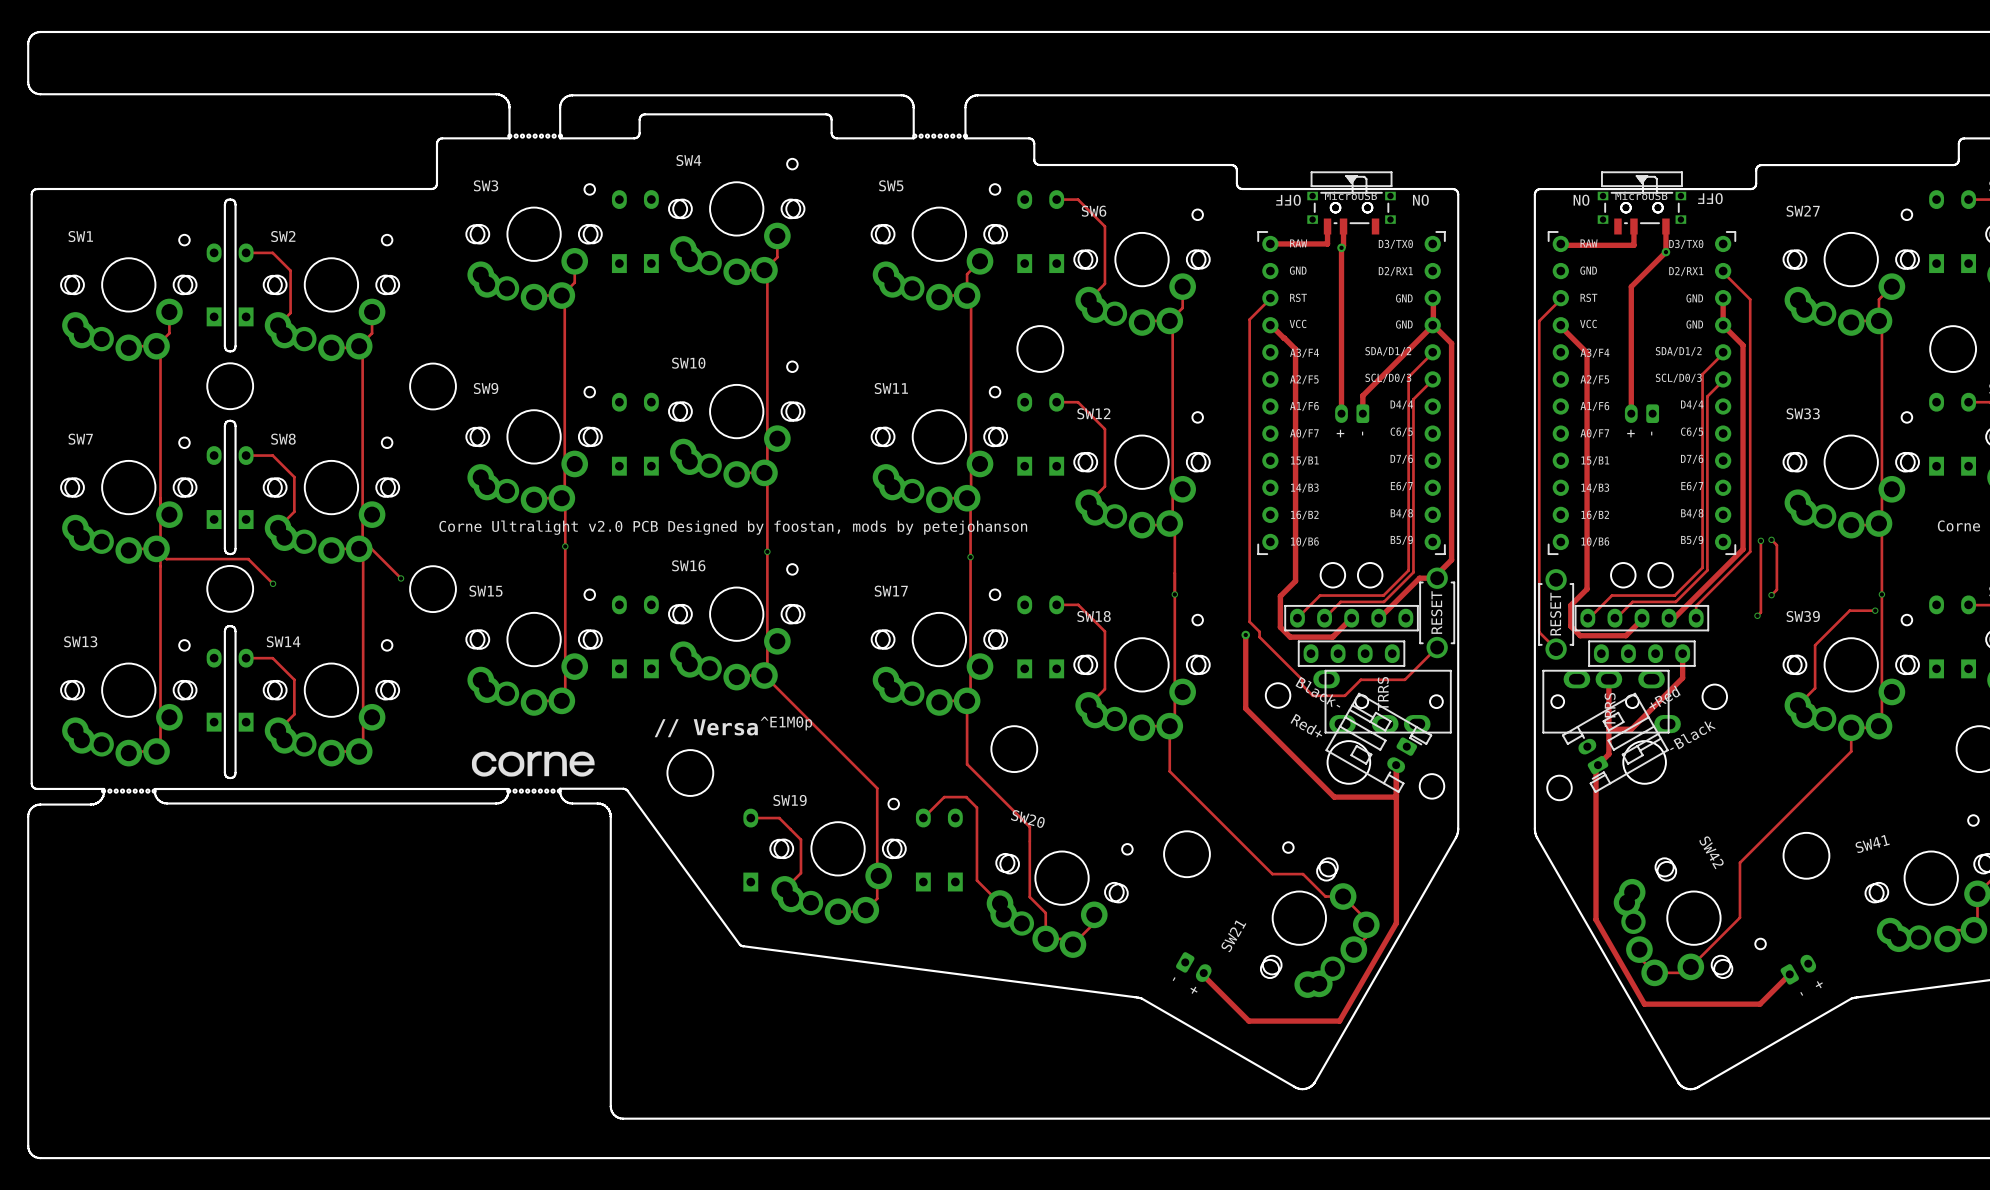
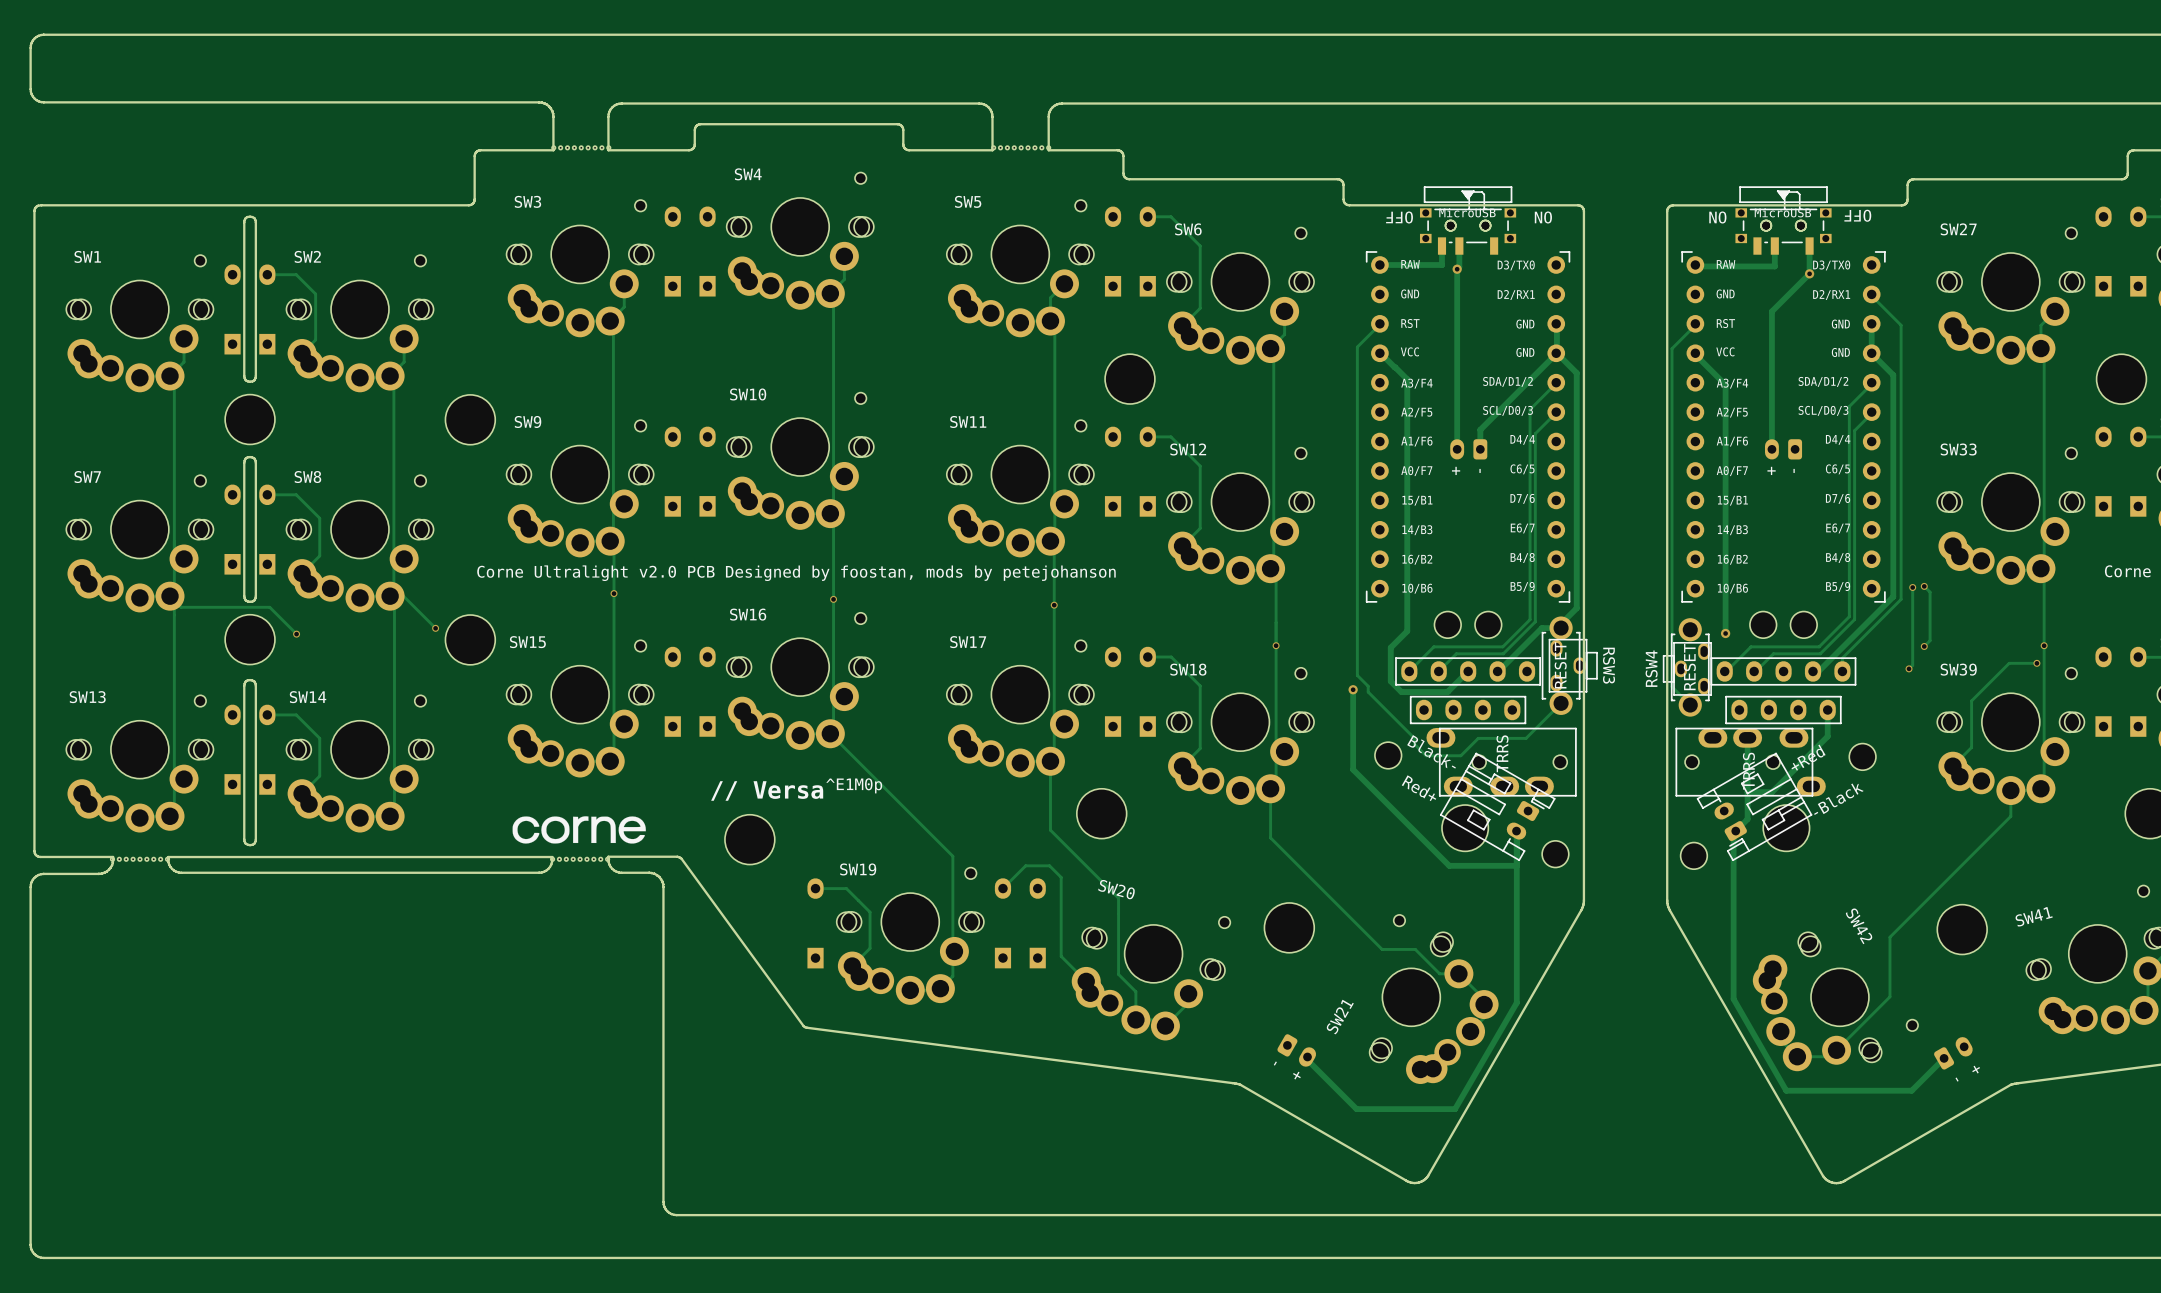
track: (1587, 352) (1587, 589) (1570, 605) (1570, 626) (1580, 635) (1625, 635) (1642, 619) -> (1723, 383) (1725, 384) (1725, 633)
via: none -> (1725, 633)
RSW3: none -> (1573, 665)
RSW4: none -> (1687, 668)

